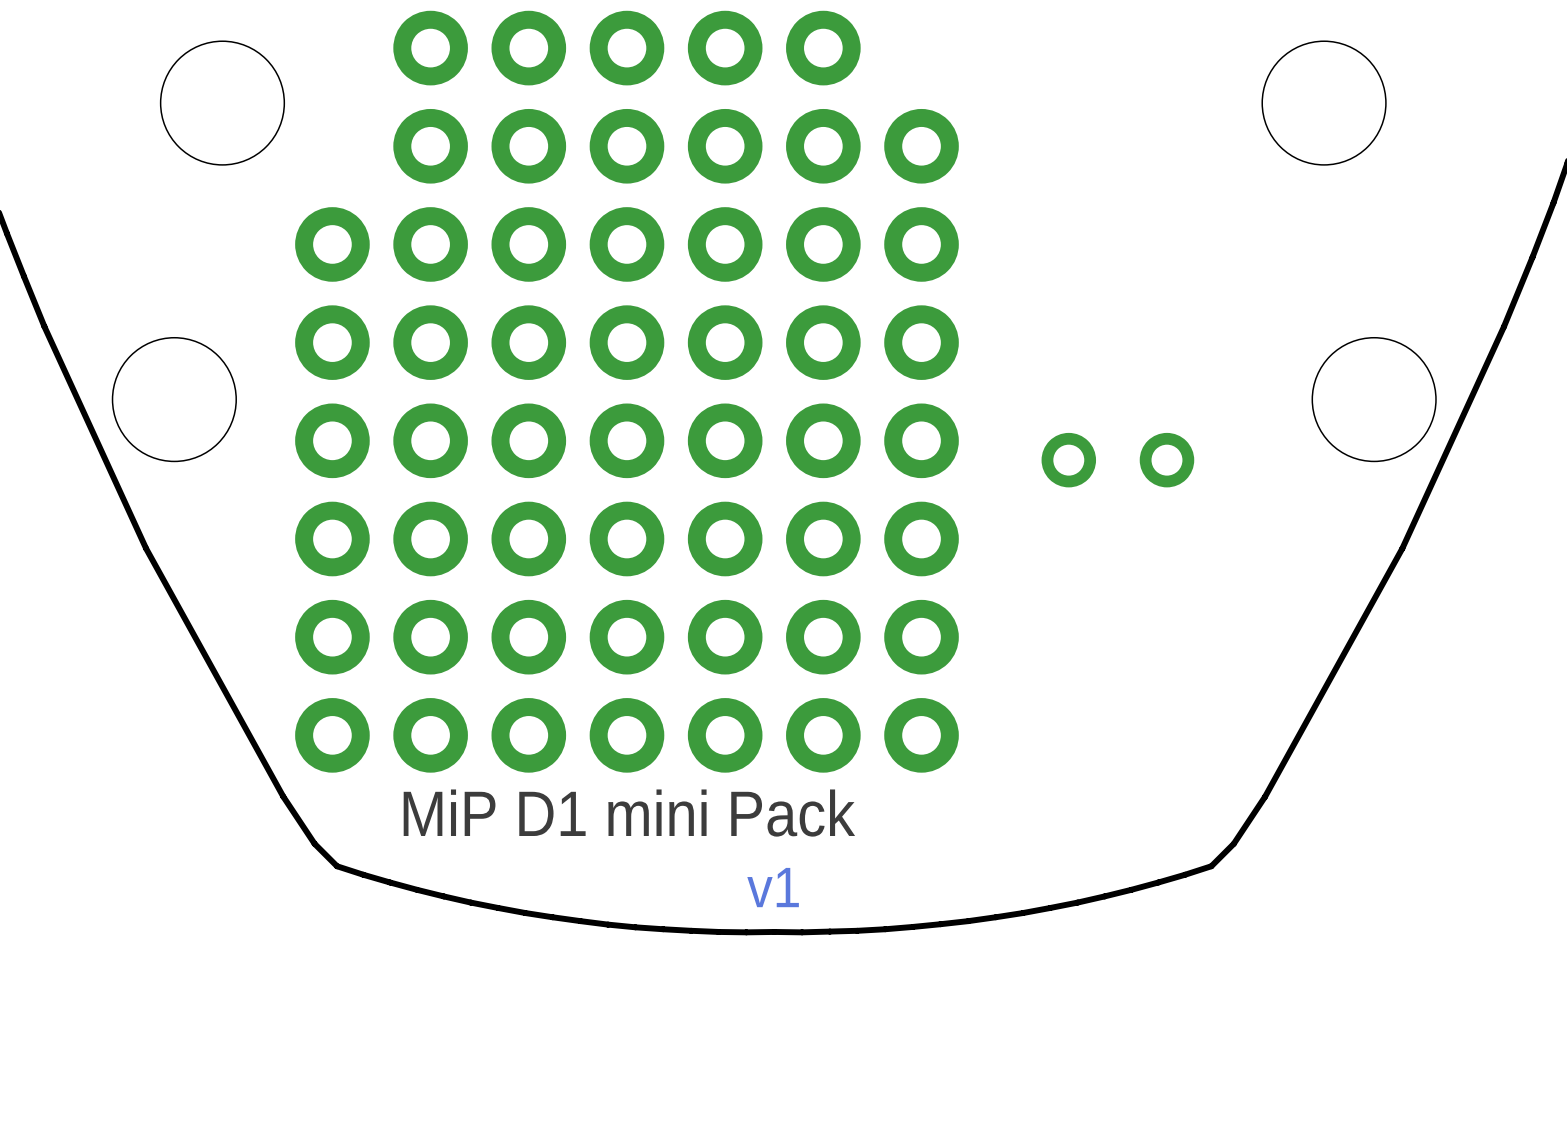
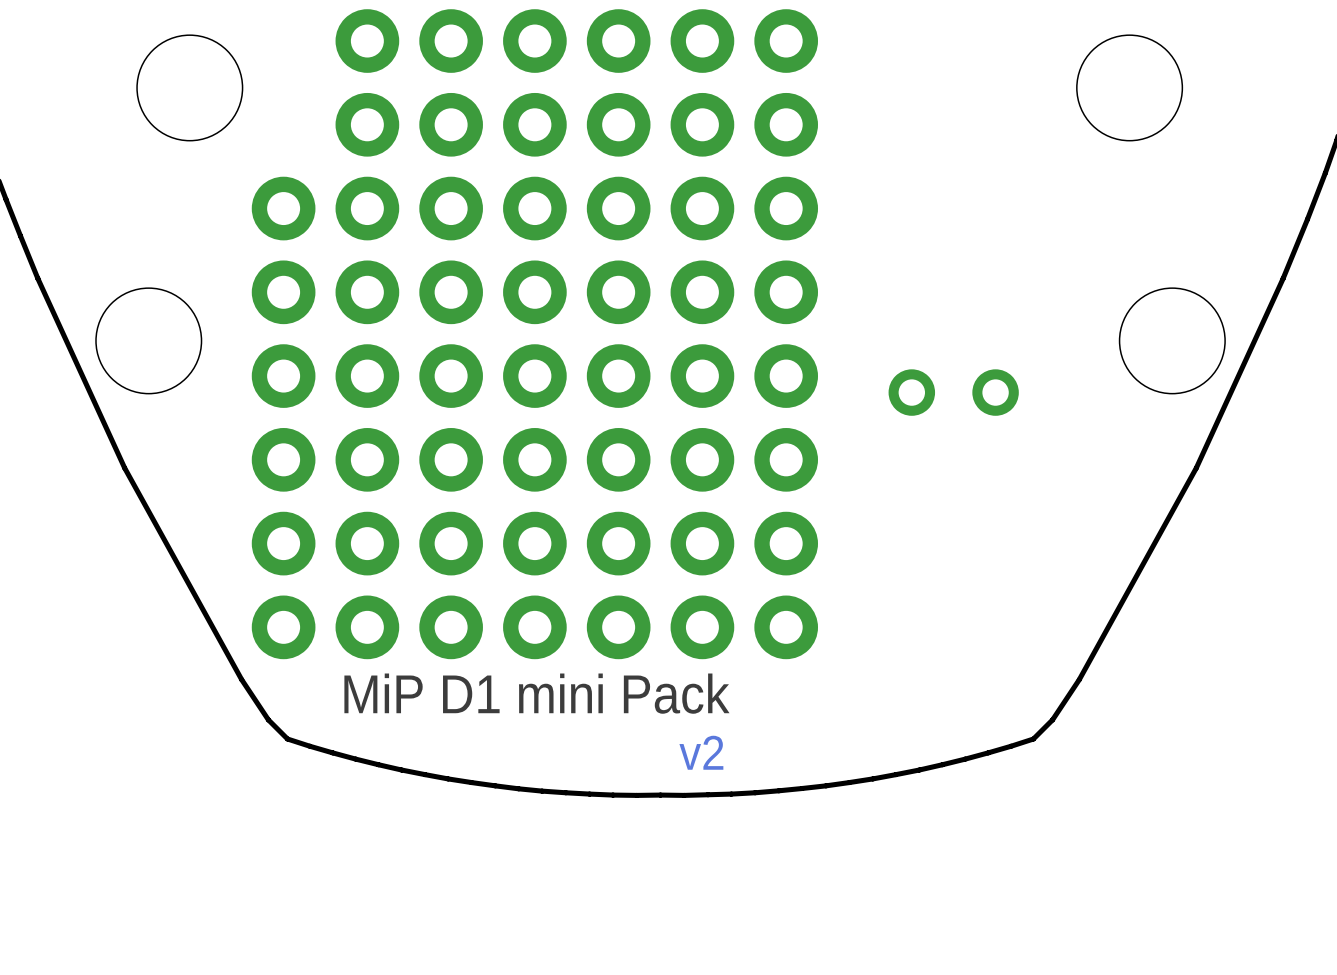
via: none -> (786, 41)
text: none -> v2 (701, 752)
text: v1 (773, 887) -> none

